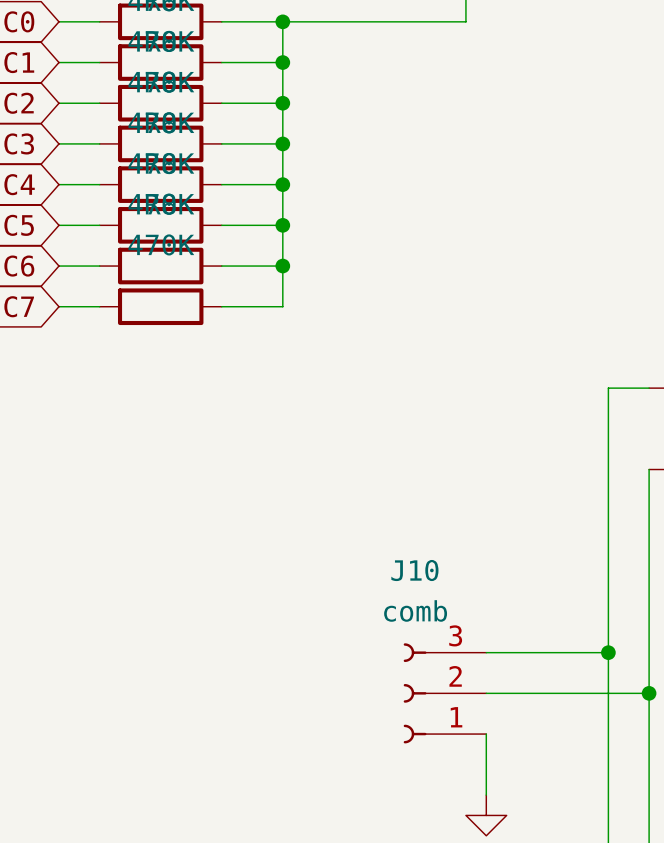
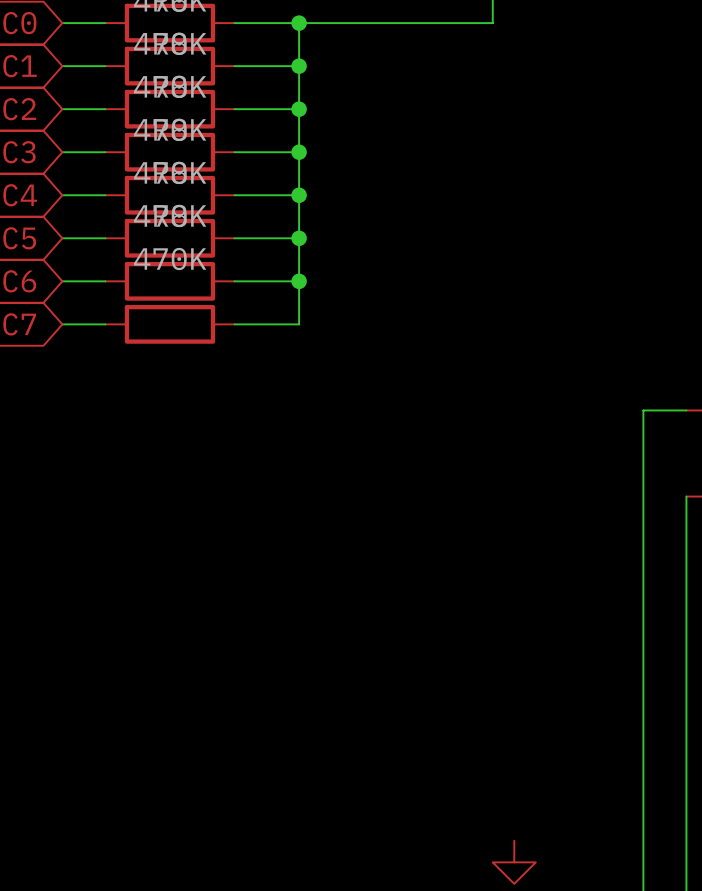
wire: (486, 652) (608, 652) -> none
junction: (608, 652) -> none
J10: comb (444, 693) -> none
wire: (486, 693) (649, 693) -> none
junction: (649, 693) -> none
wire: (486, 734) (486, 795) -> none

